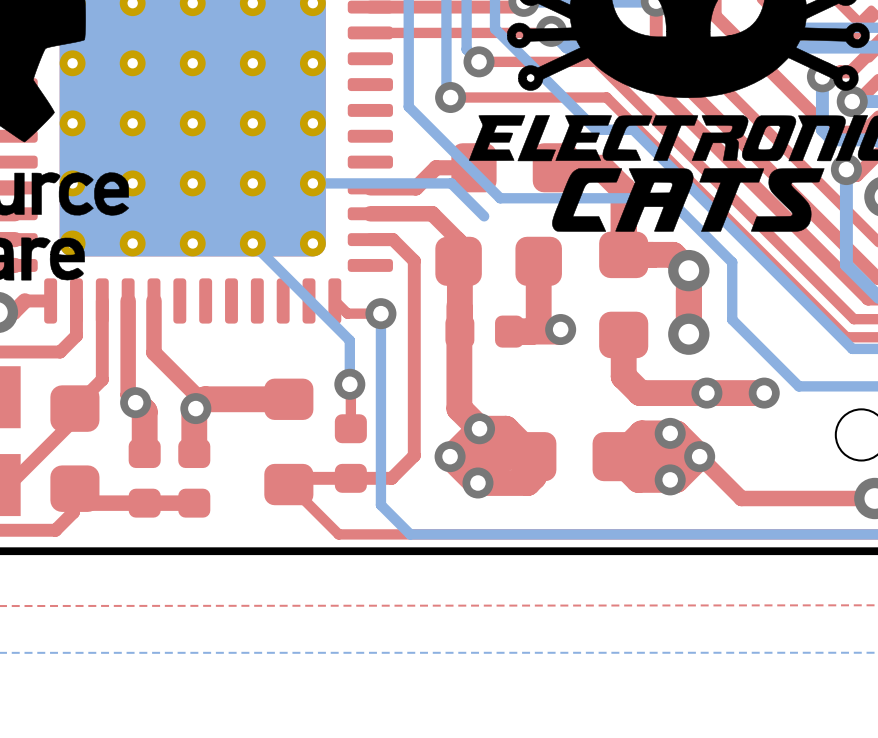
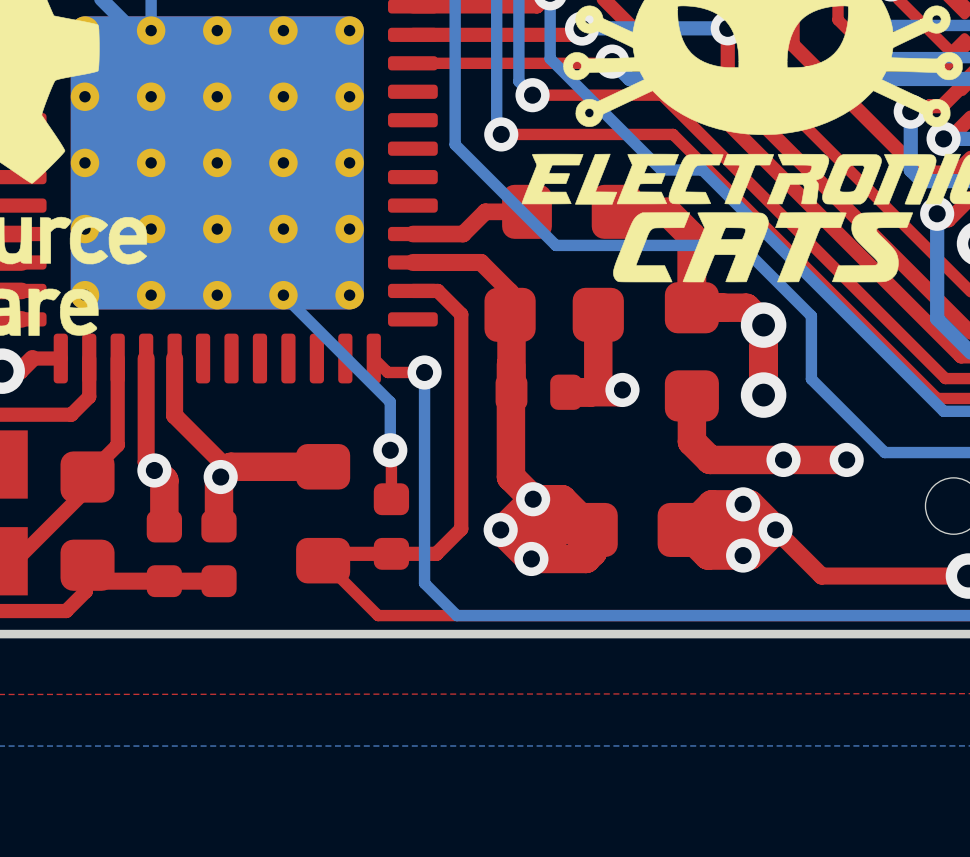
bottom track: (312, 183) (451, 183) (484, 216) -> none

